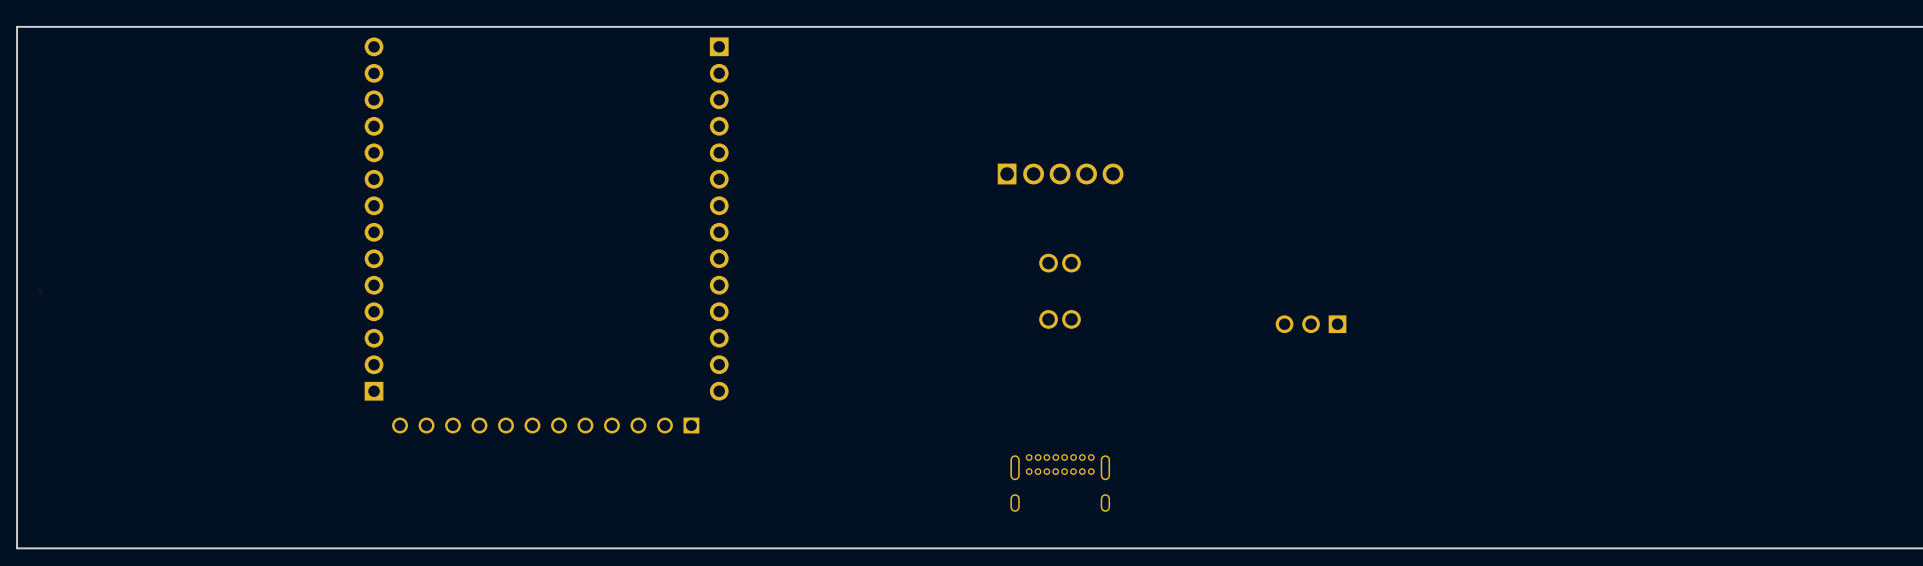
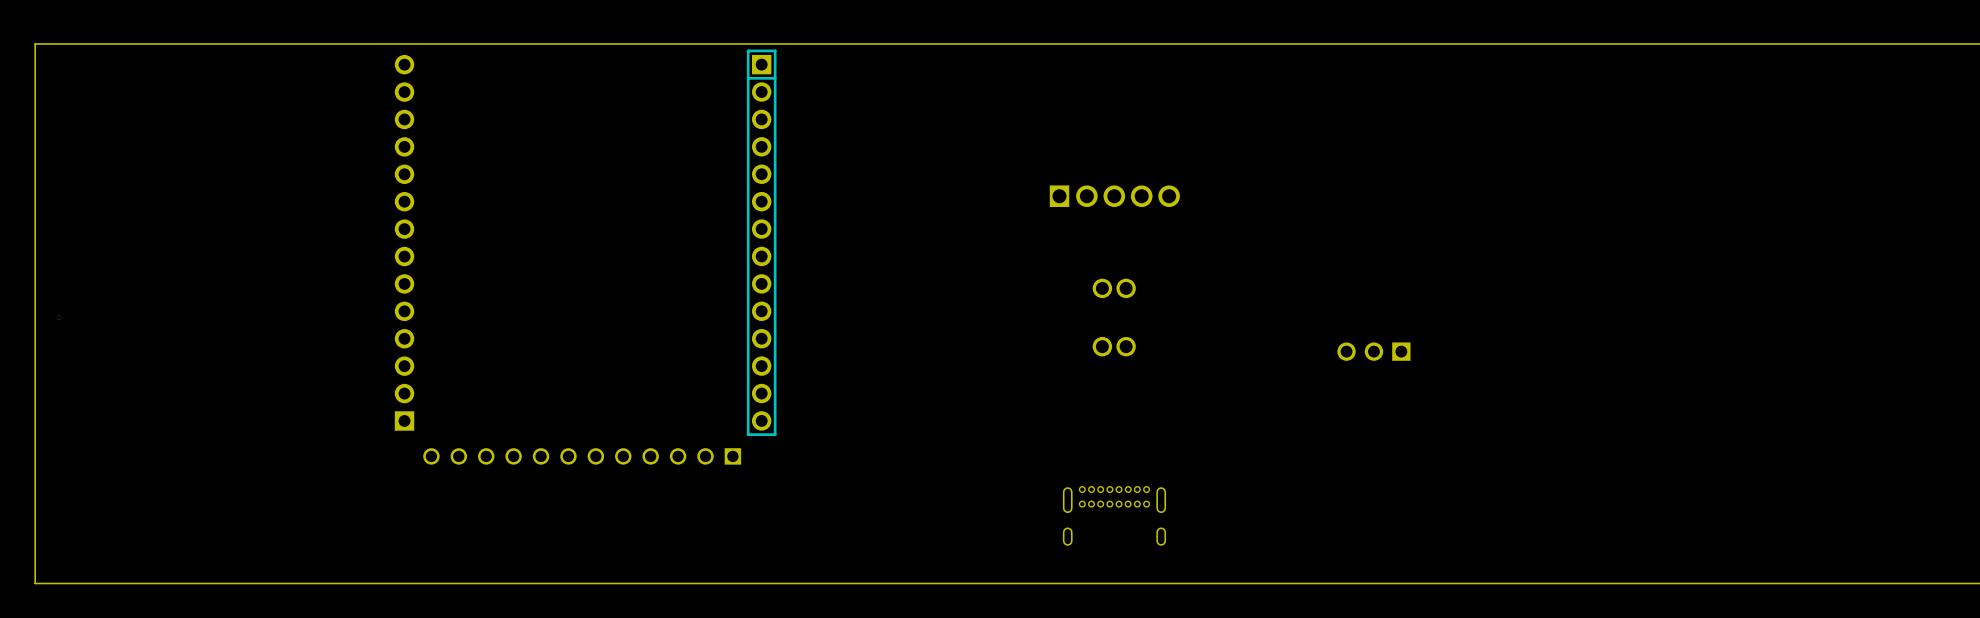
part side: top (719, 218) -> bottom (761, 242)

